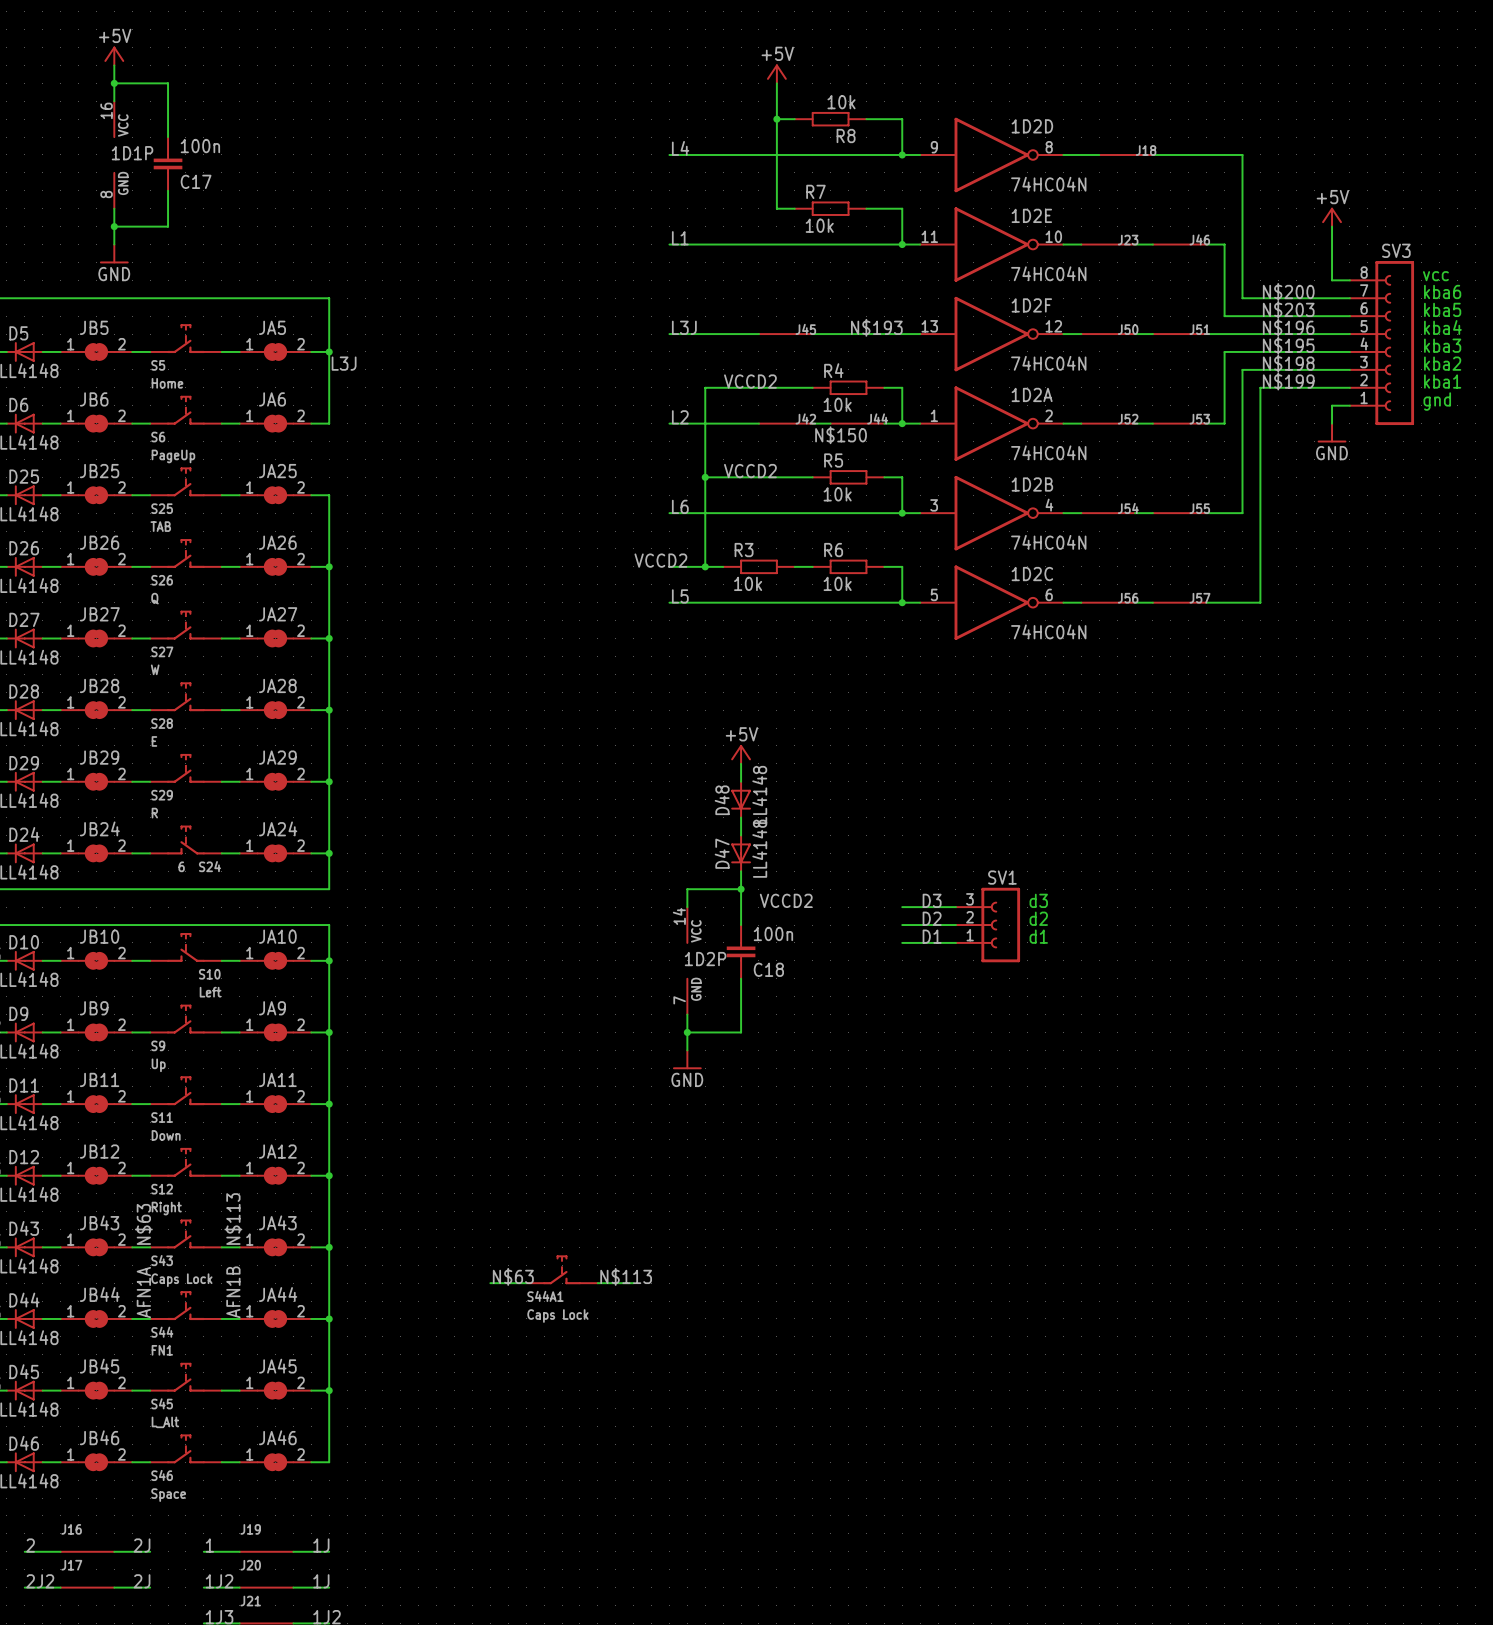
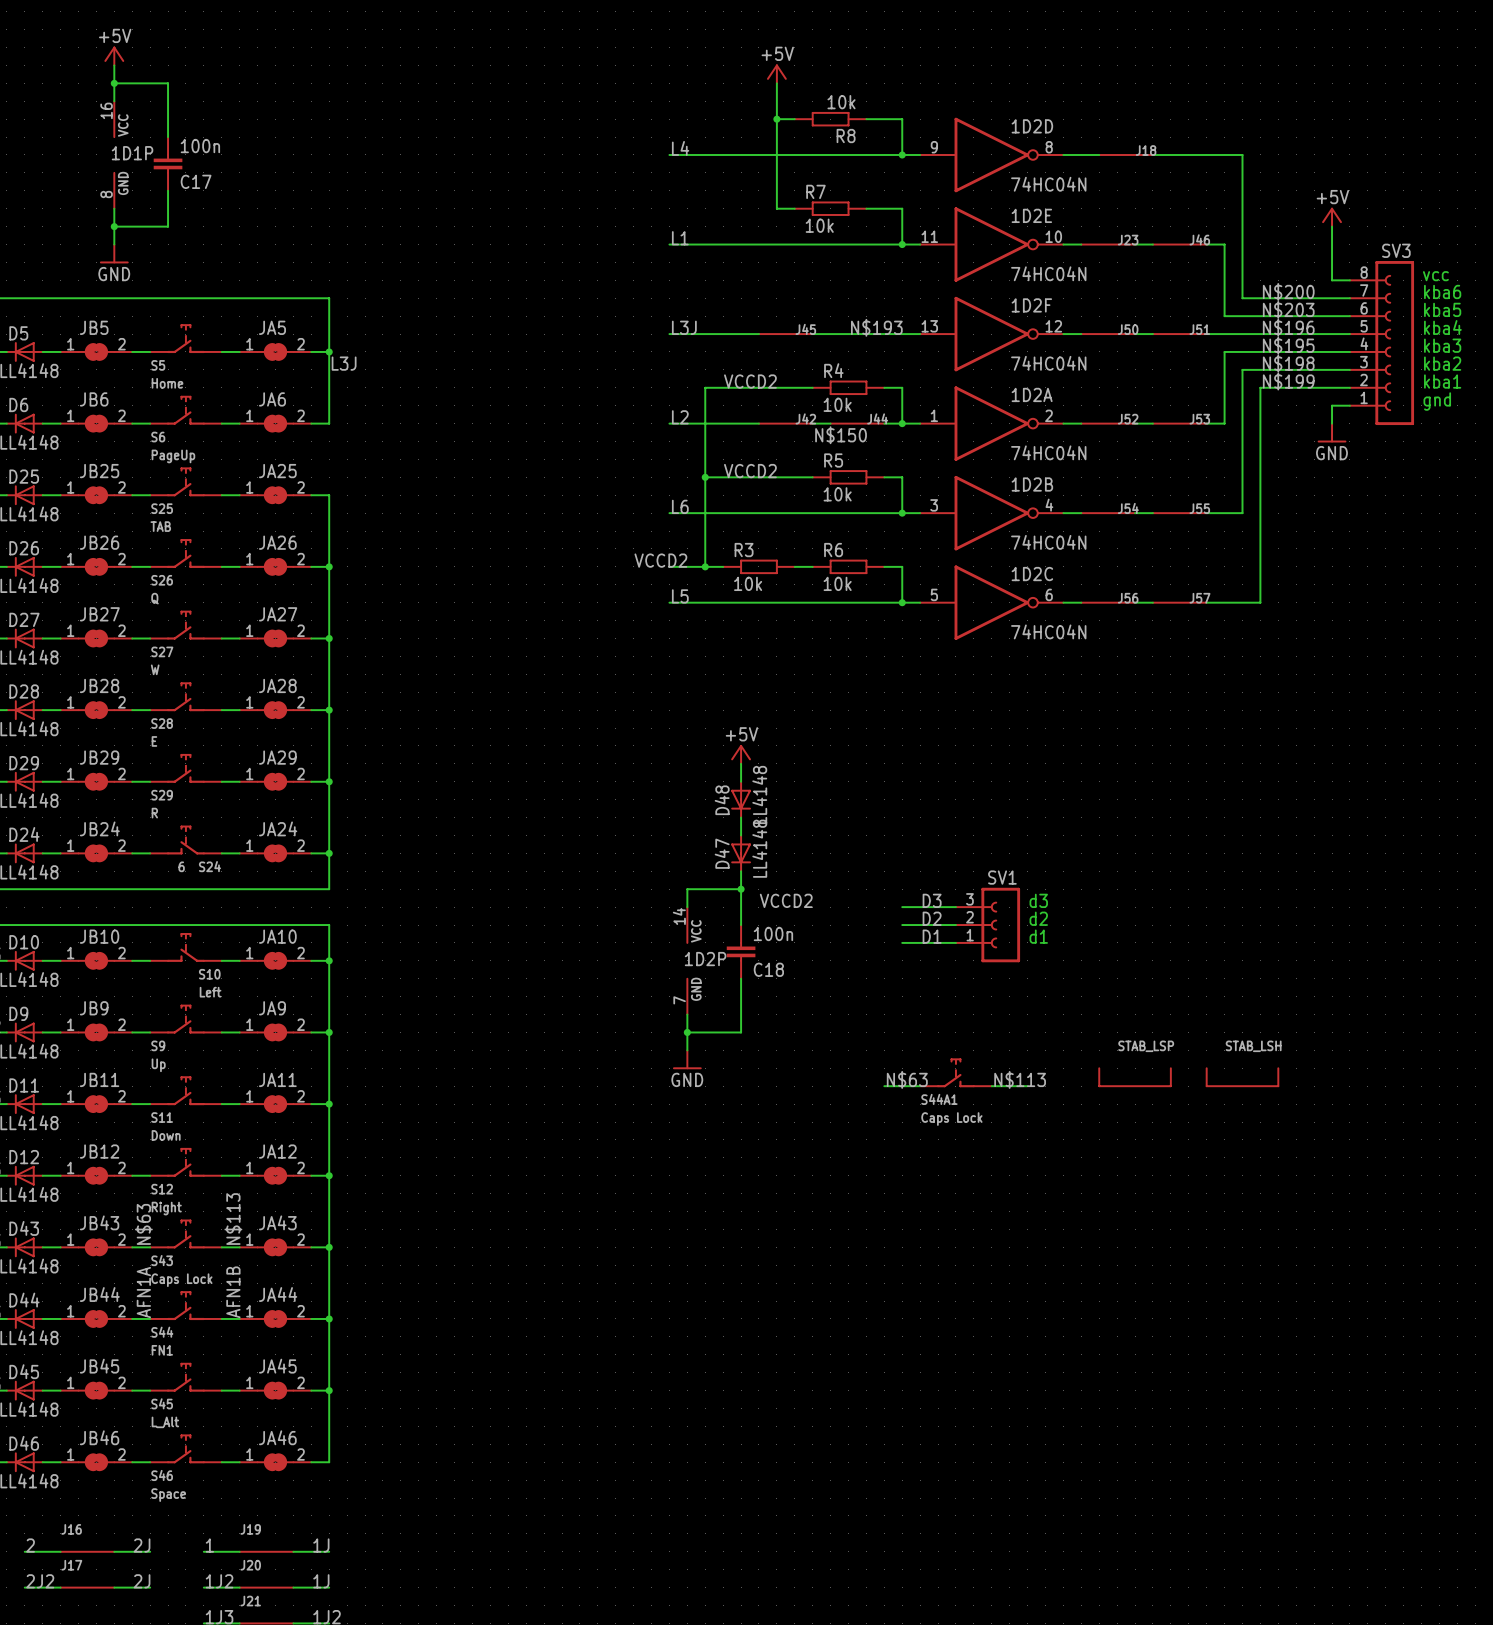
STAB_LSP: none -> (1135, 1077)
STAB_LSH: none -> (1242, 1077)
label: none -> N$63 (907, 1079)
label: none -> N$113 (1020, 1079)
wire: none -> (884, 1086) (920, 1086)
wire: none -> (991, 1086) (1027, 1086)
S44A1 position: (562, 1270) -> (955, 1073)
label: N$63 (513, 1276) -> none
label: N$113 (626, 1276) -> none
wire: (490, 1283) (526, 1283) -> none
wire: (597, 1283) (633, 1283) -> none

